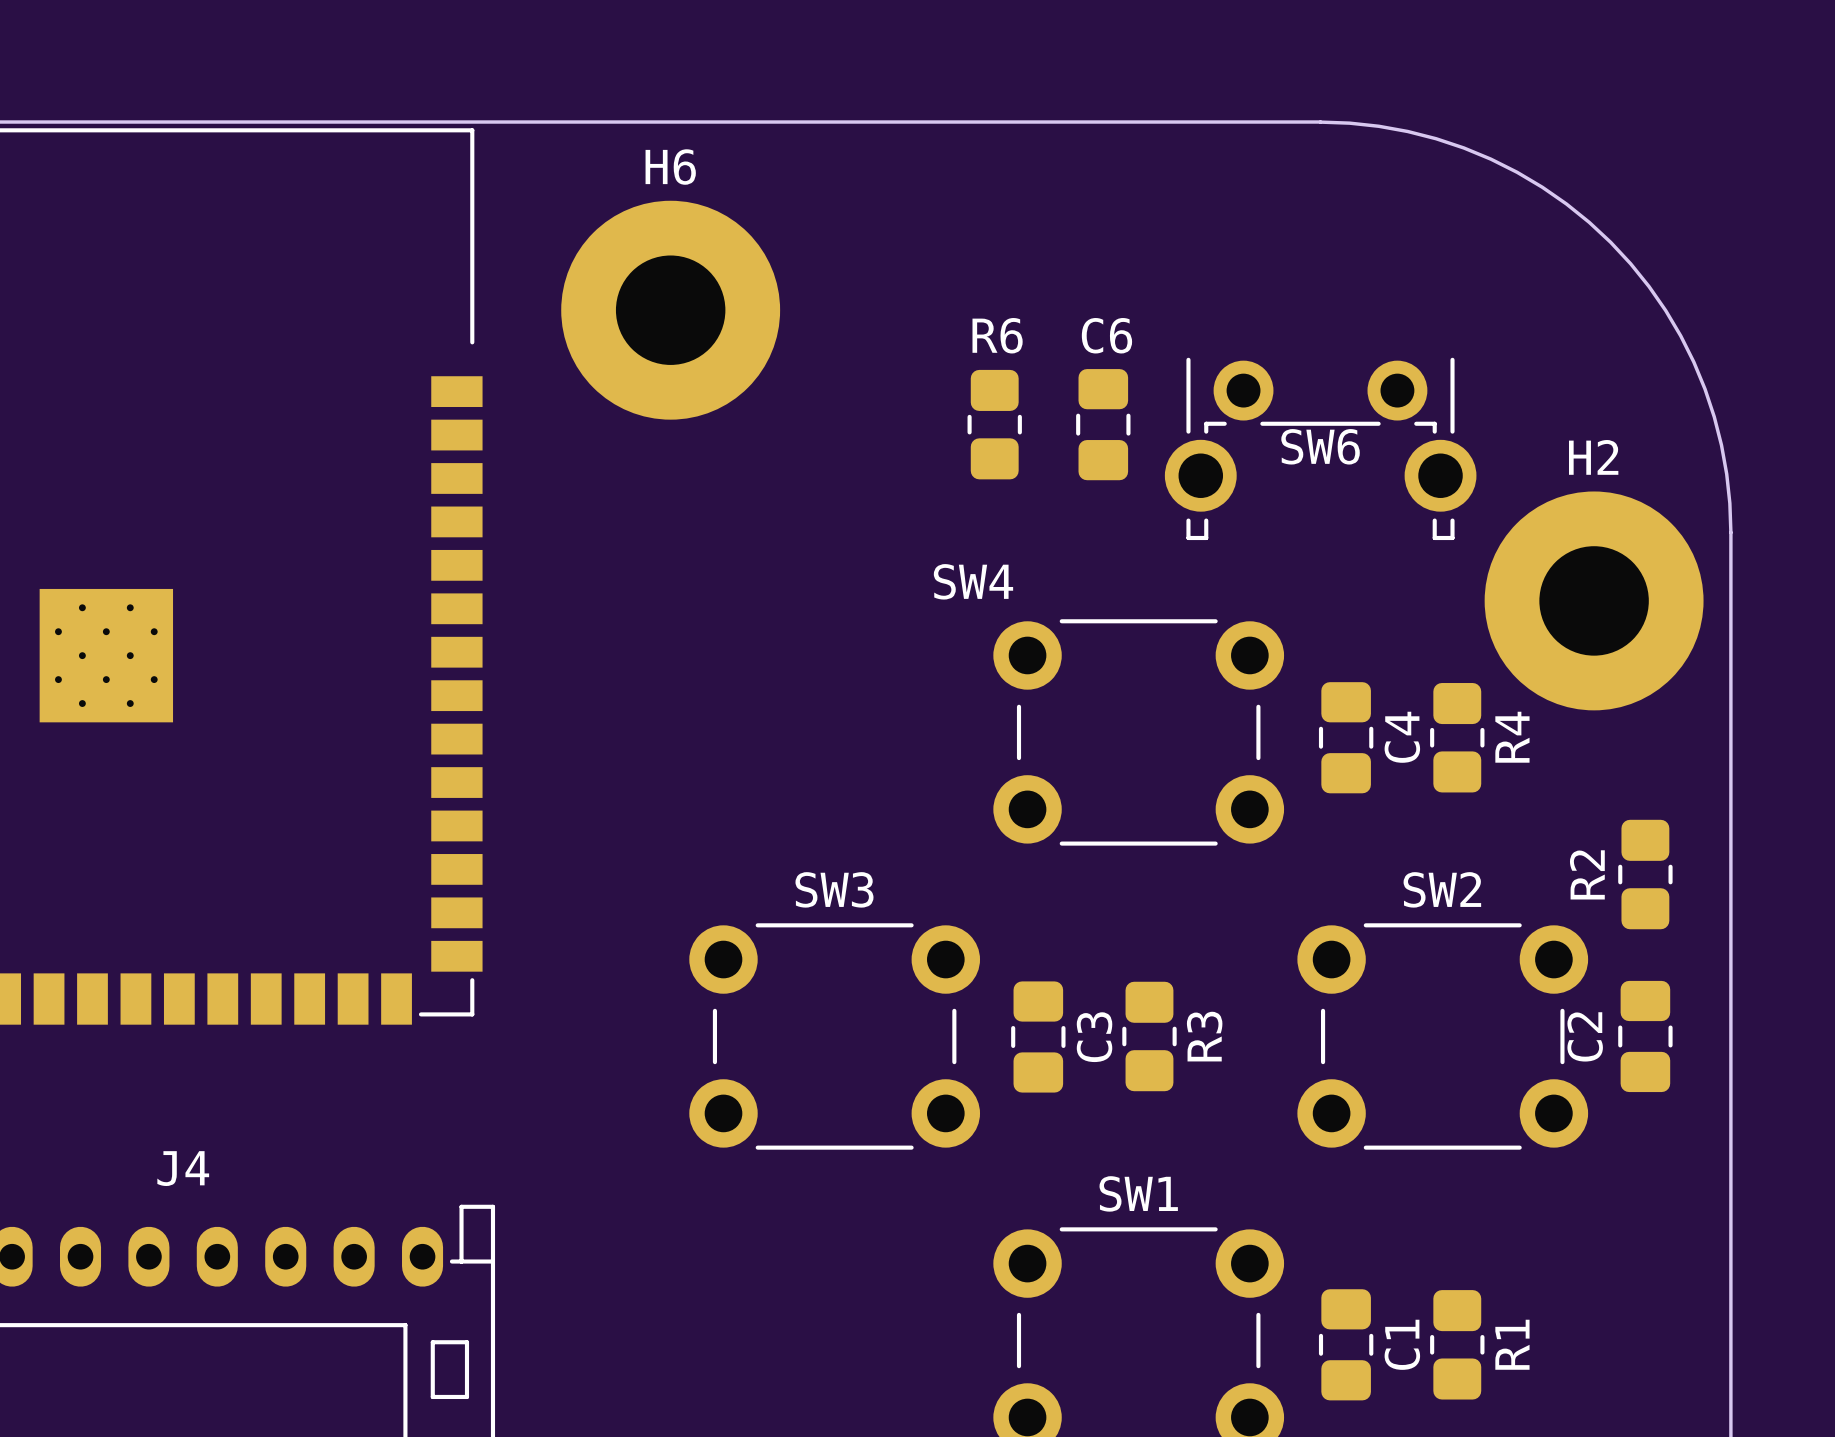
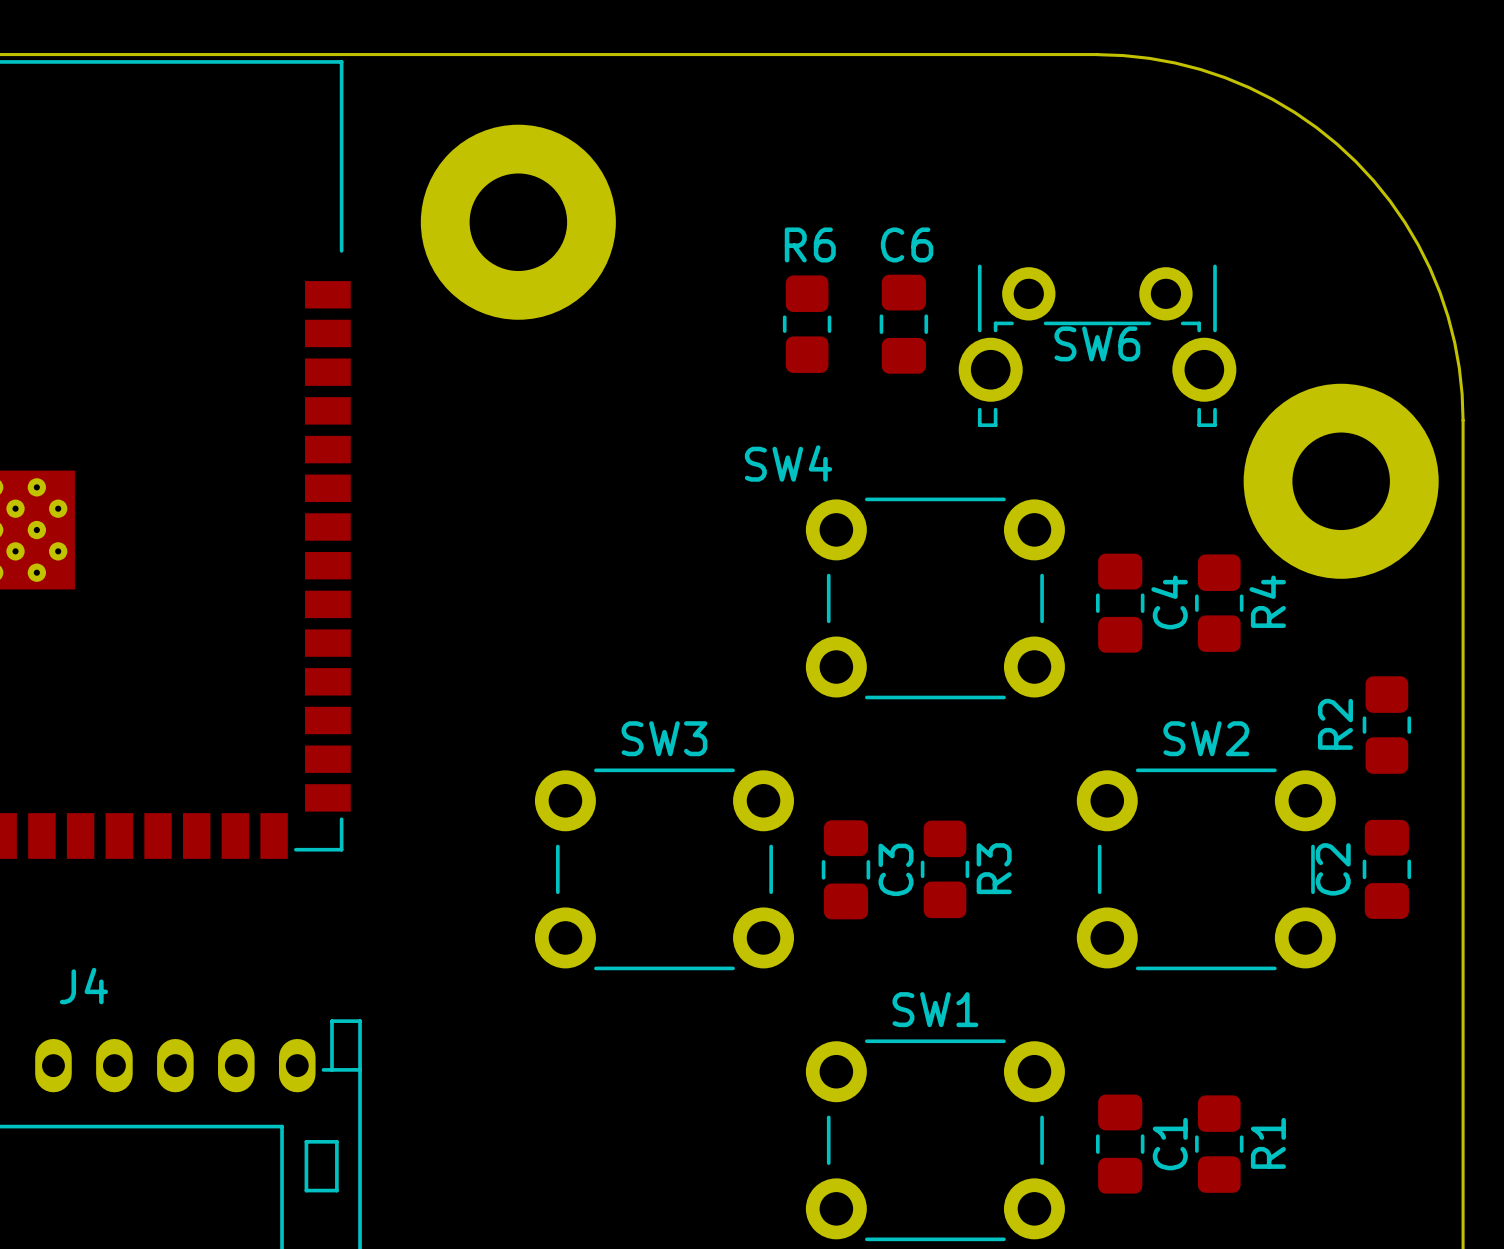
H6 name: H6 (670, 167) -> none
H2 name: H2 (1593, 457) -> none

